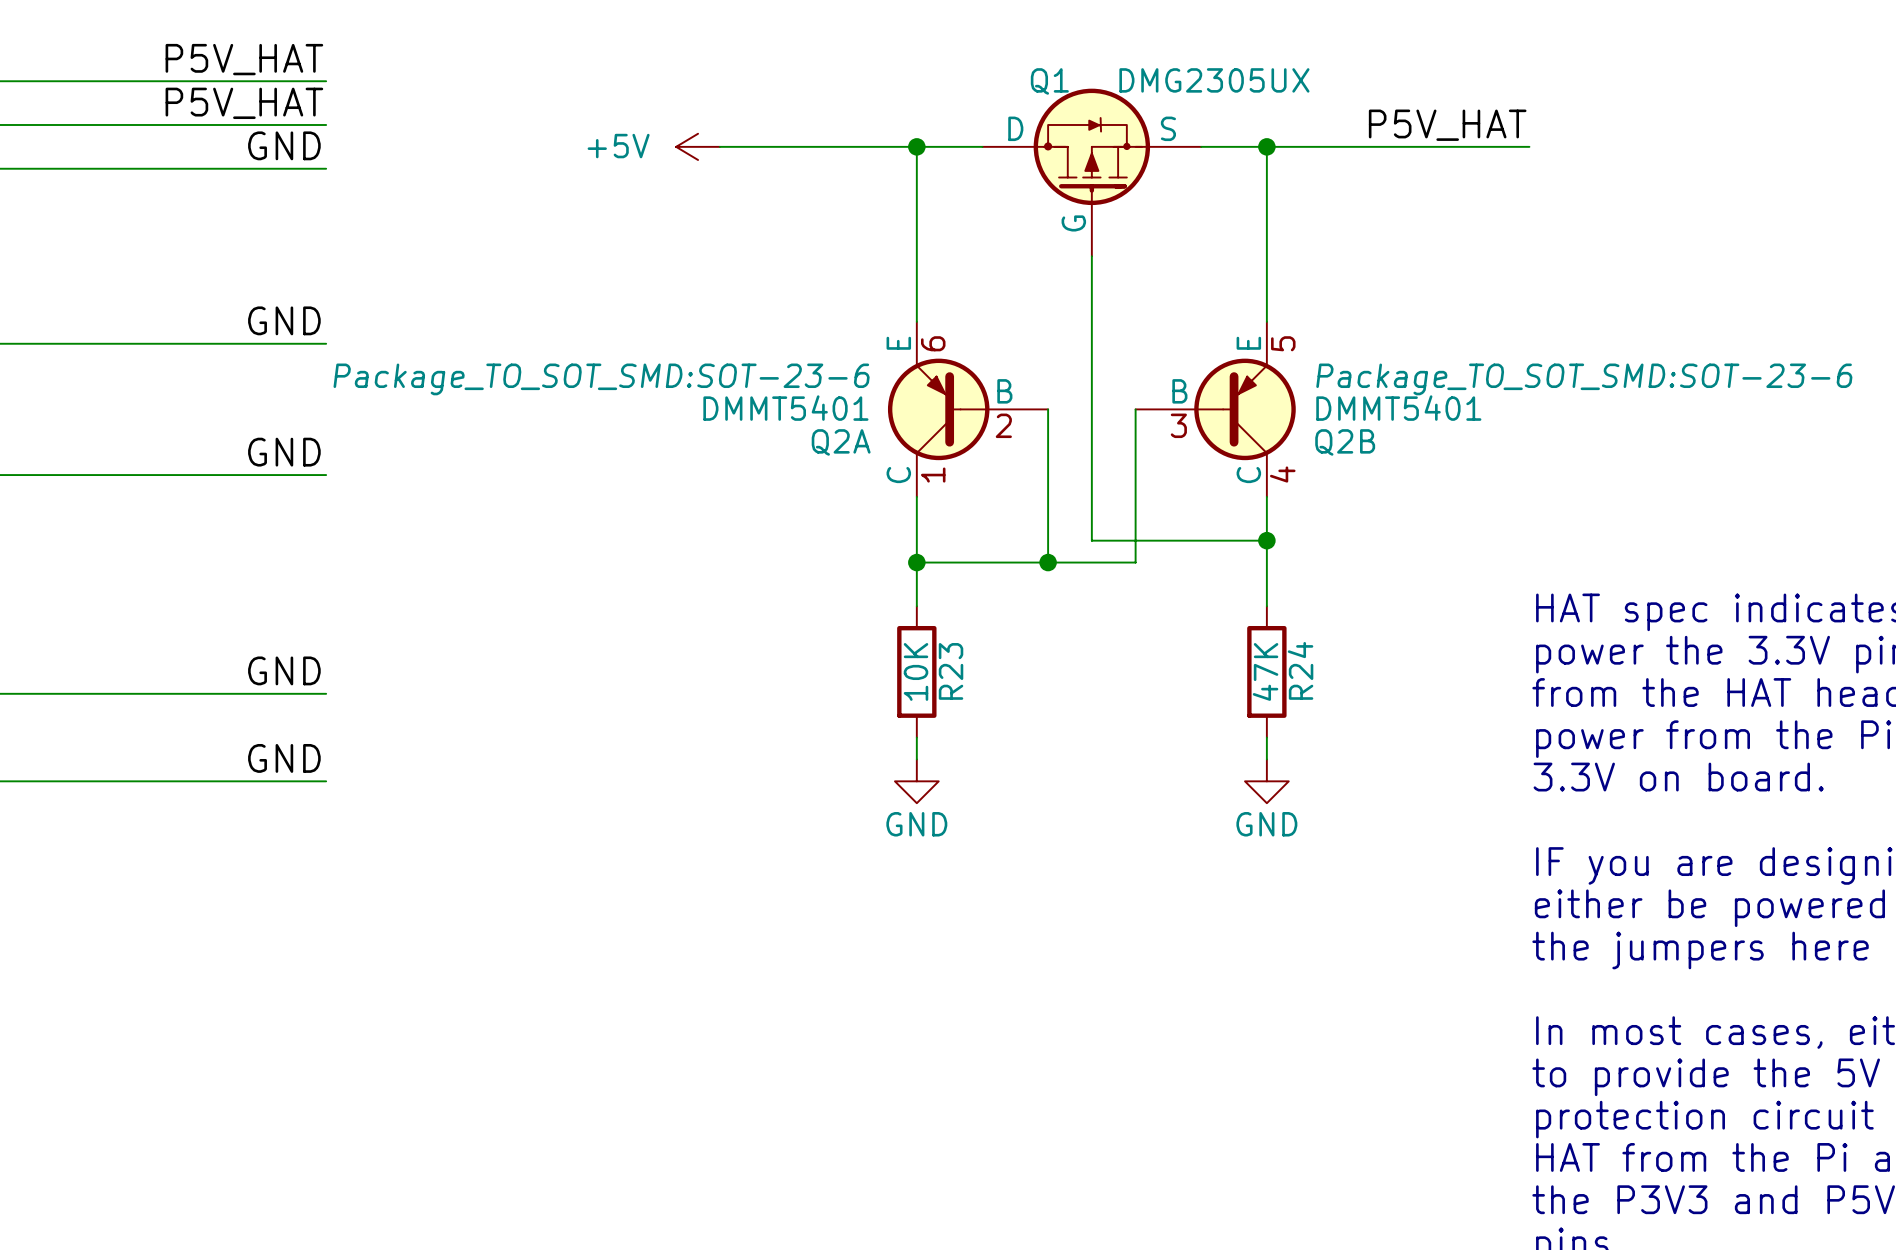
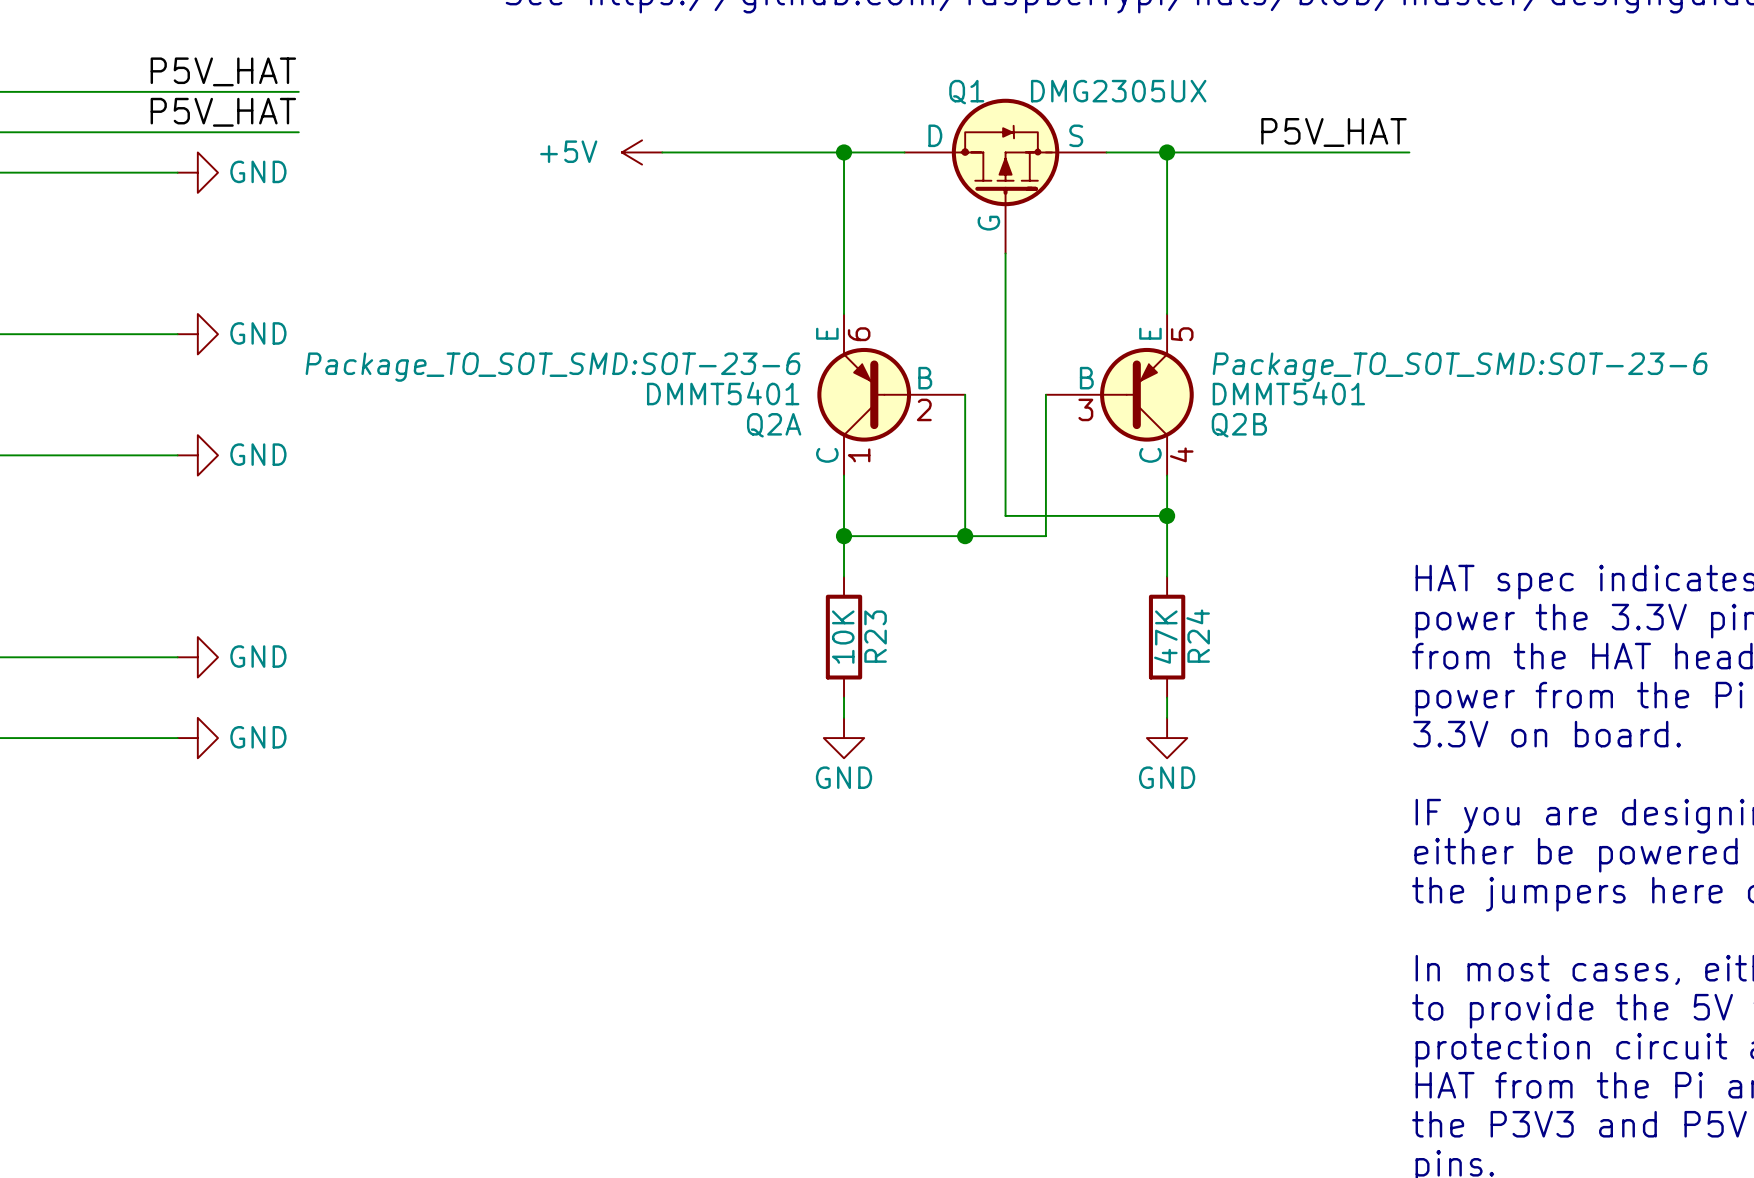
label: GND (284, 145) -> none
wire: (194, 168) (326, 168) -> none
power symbol: none -> GND (197, 172)
label: GND (284, 320) -> none
wire: (194, 343) (326, 343) -> none
power symbol: none -> GND (197, 334)
label: GND (284, 452) -> none
wire: (194, 475) (326, 475) -> none
power symbol: none -> GND (197, 455)
label: GND (284, 670) -> none
wire: (194, 693) (326, 693) -> none
power symbol: none -> GND (197, 657)
label: GND (284, 758) -> none
wire: (194, 781) (326, 781) -> none
power symbol: none -> GND (197, 738)

